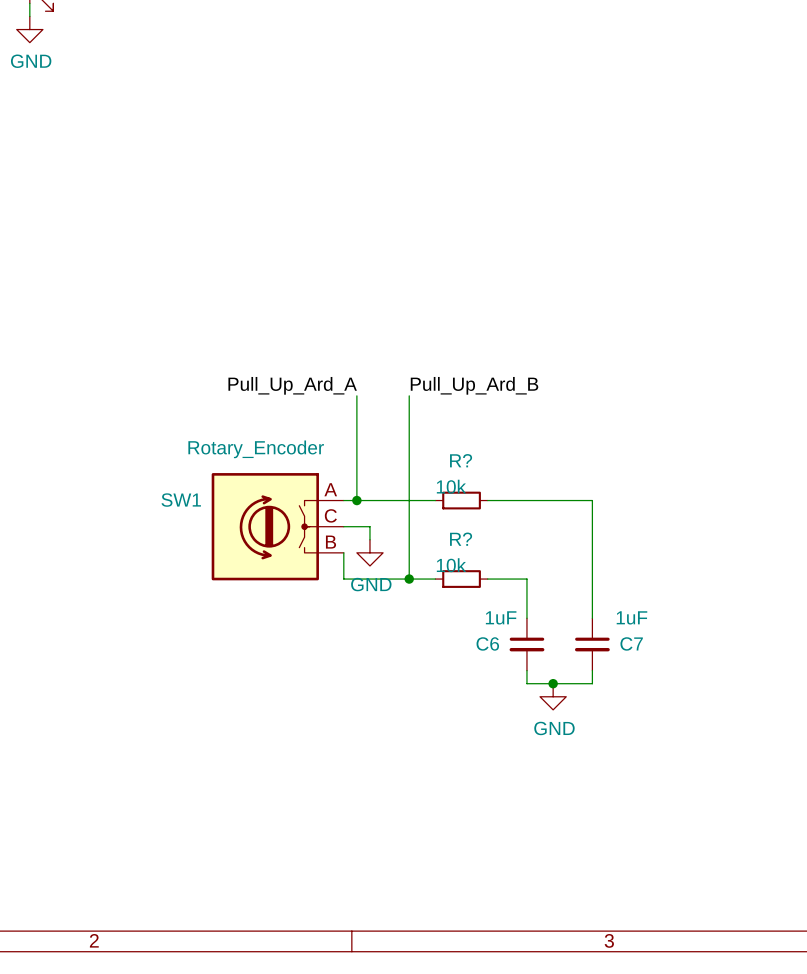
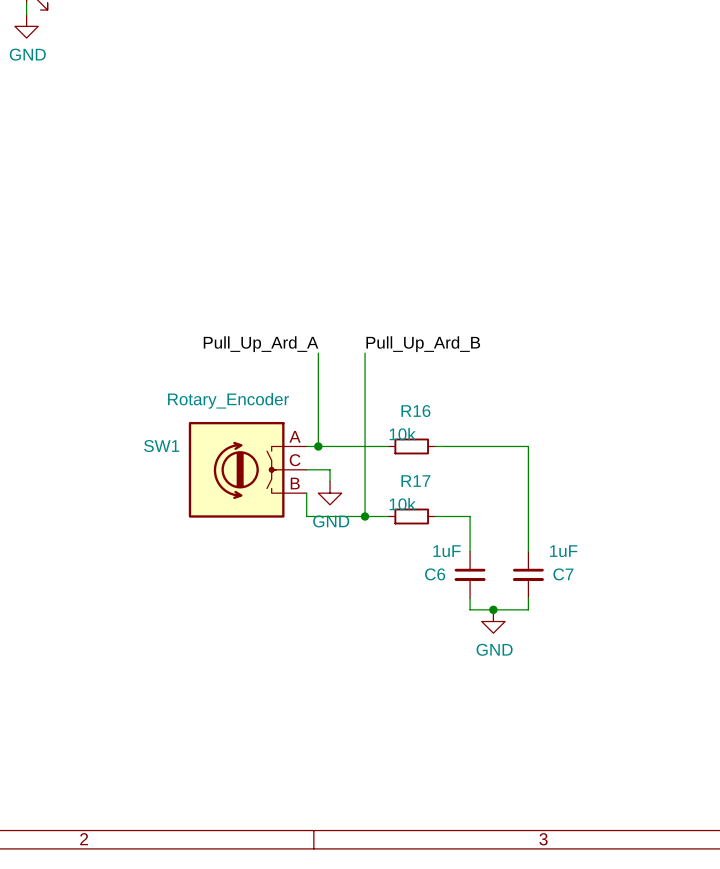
R? name: R? (461, 460) -> R16 (415, 411)
R? name: R? (461, 539) -> R17 (415, 481)

